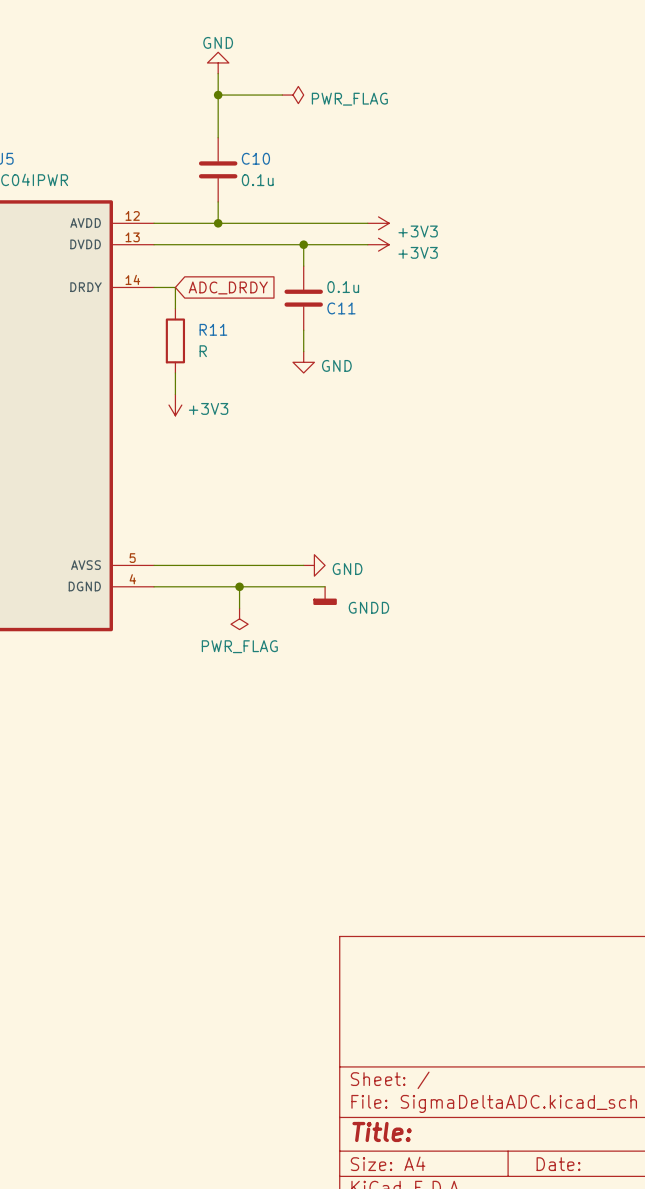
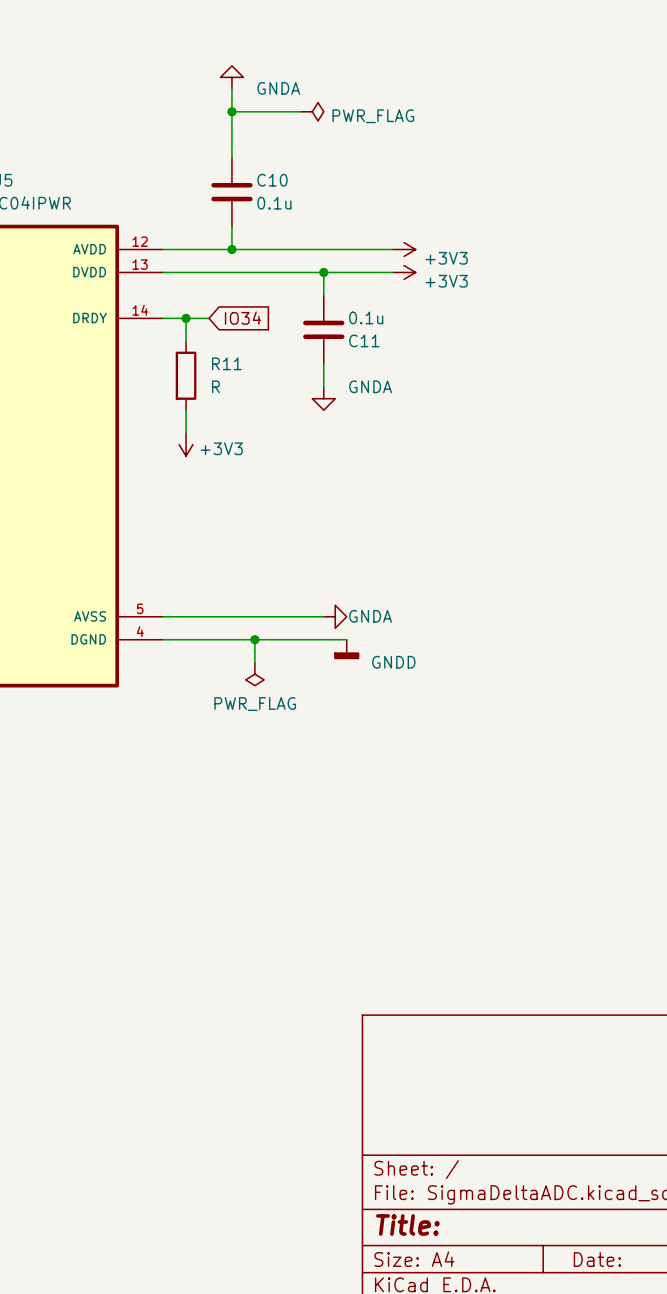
power symbol: GND (218, 62) -> GNDA (231, 77)
wire: none -> (186, 318) (209, 318)
junction: none -> (186, 318)
global label: ADC_DRDY (228, 287) -> none
global label: none -> IO34 (243, 318)
power symbol: GND (303, 362) -> GNDA (323, 398)
power symbol: GND (314, 565) -> GNDA (335, 616)

